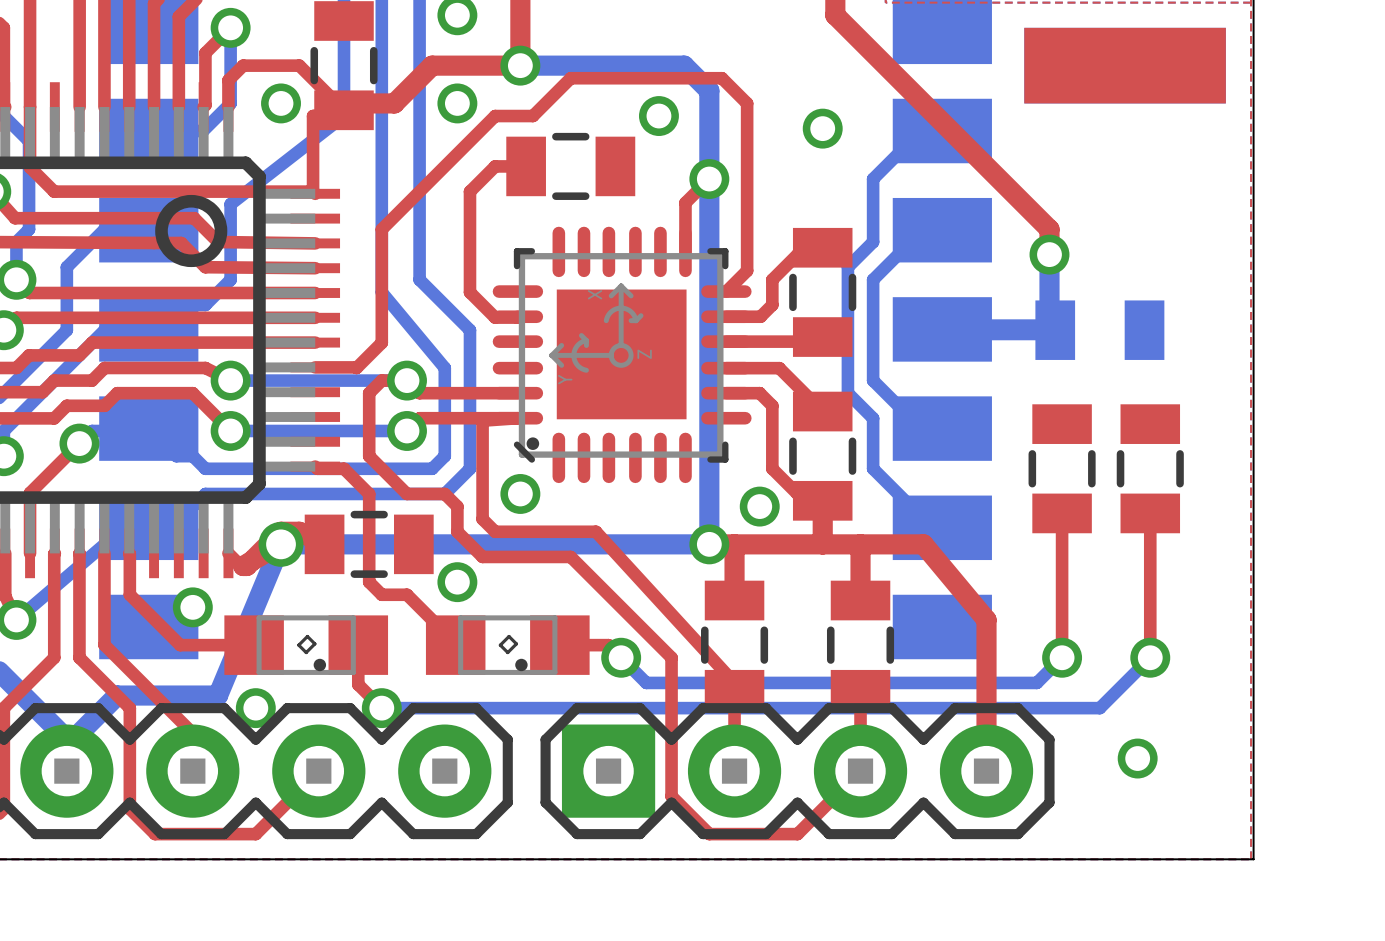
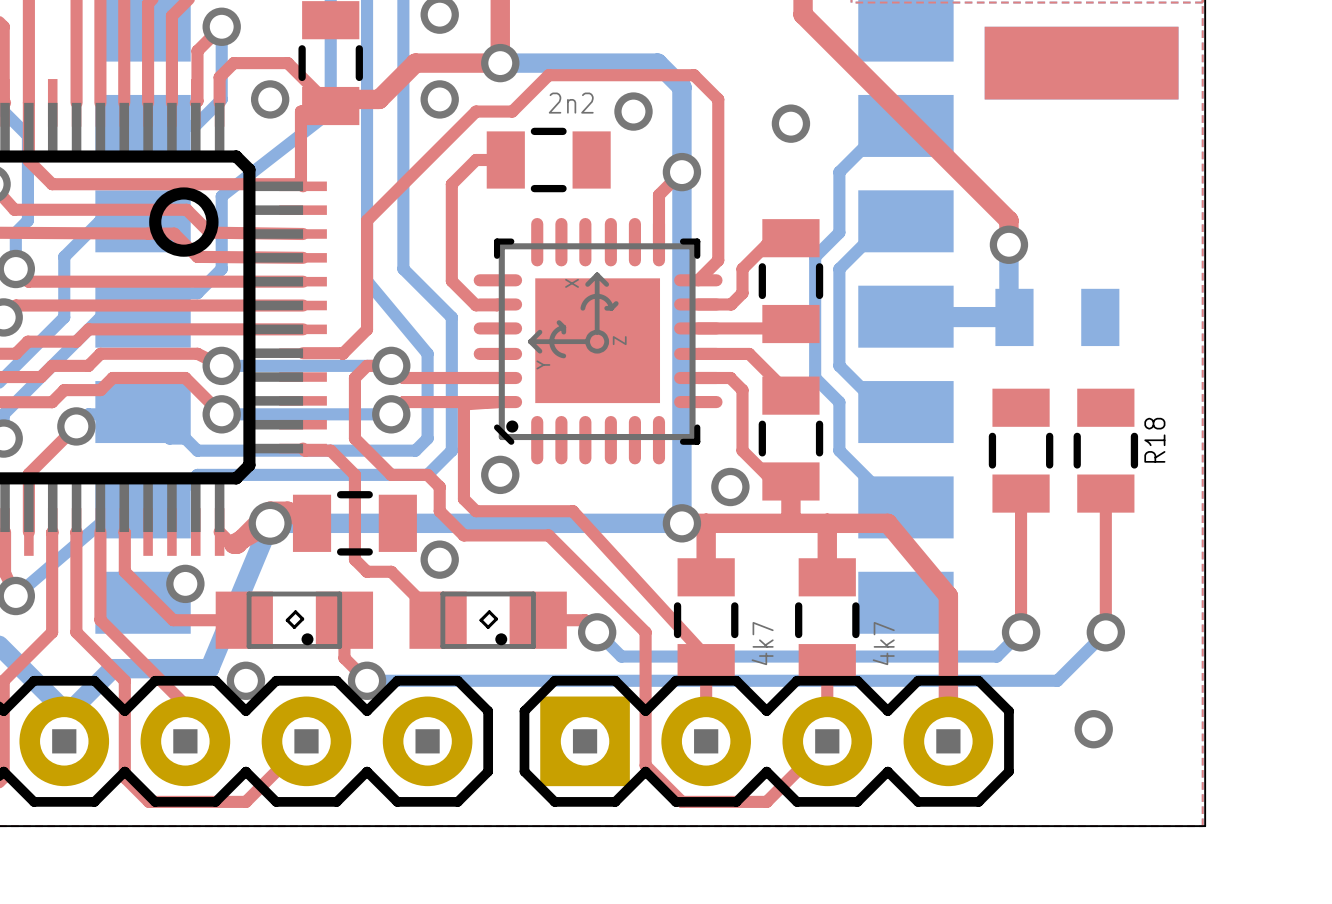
part value: none -> 2n2 (571, 103)
R18 name: none -> R18 (1154, 440)
part value: none -> 4k7 (762, 643)
part value: none -> 4k7 (883, 643)

